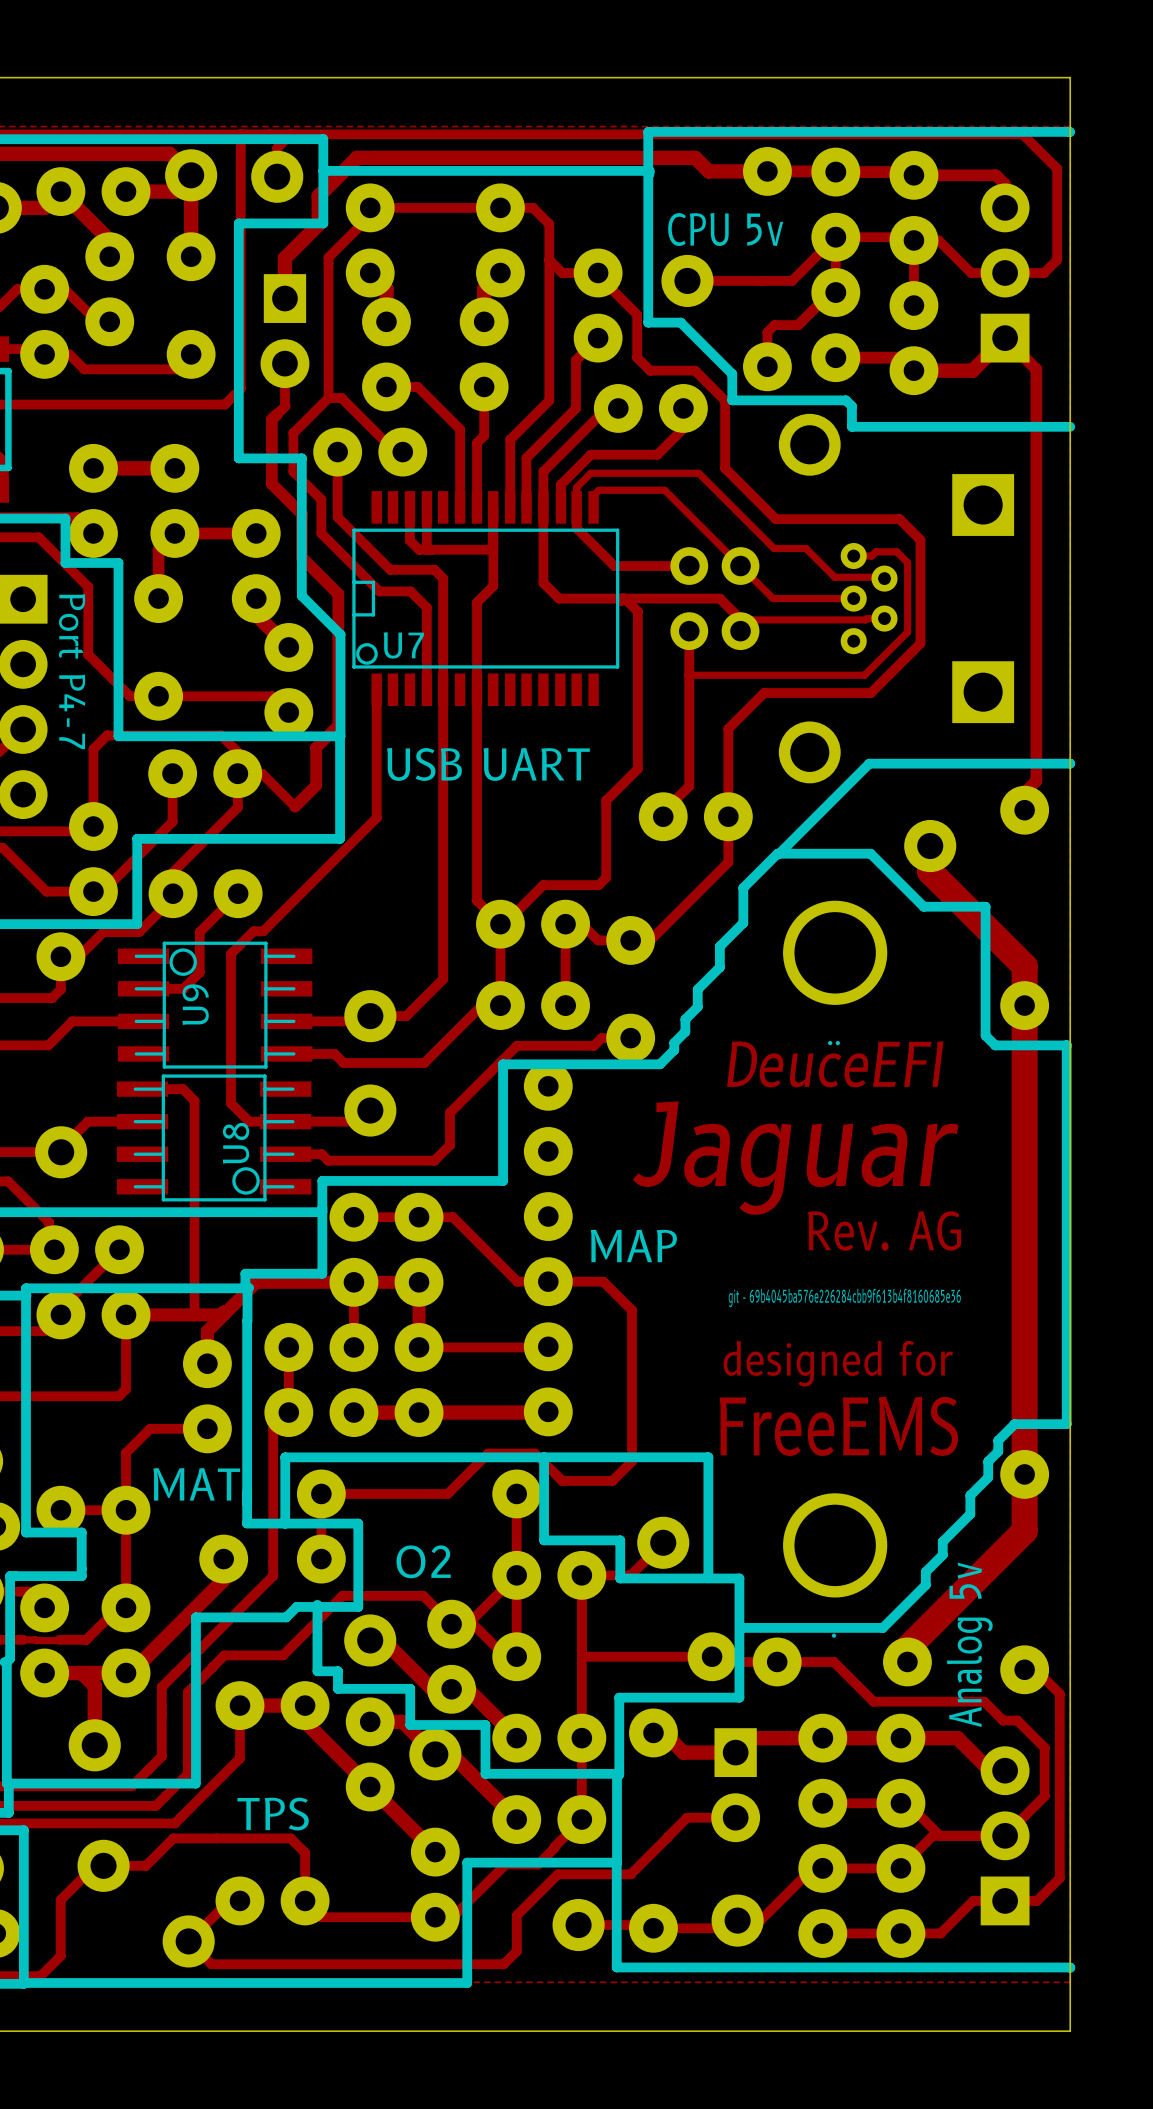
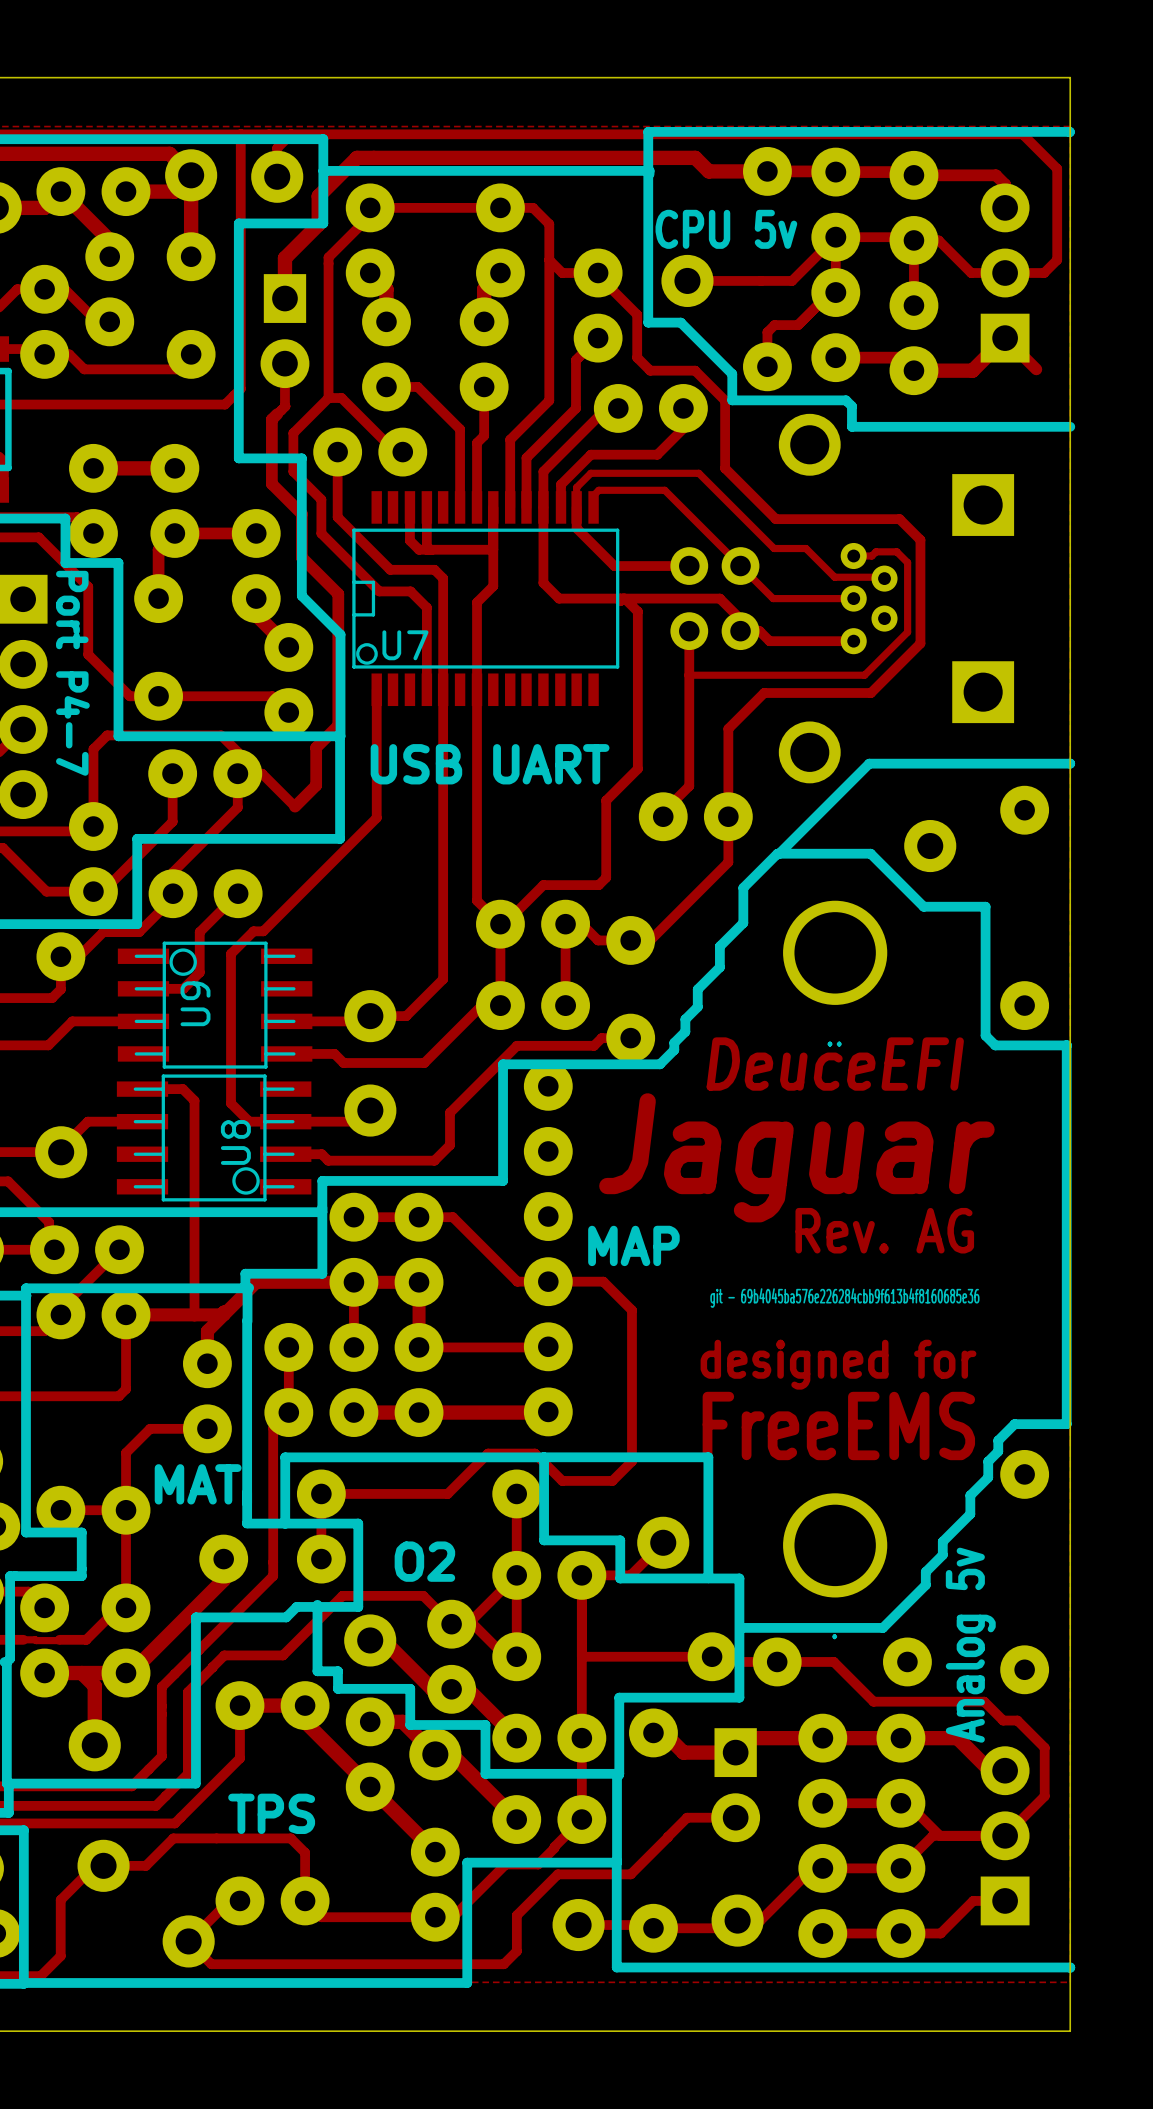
track: (1036, 369) (1036, 780) (1024, 792) (1024, 810) -> none
track: (884, 618) (751, 619) (740, 631) -> (853, 641) (769, 641) (759, 631) (740, 631)
track: (930, 846) (930, 871) (1024, 966) (1024, 1531) (907, 1648) (907, 1661) -> none
track: (1024, 1669) (1035, 1669) (1059, 1693) (1059, 1878) (1037, 1900) (1005, 1900) -> none

